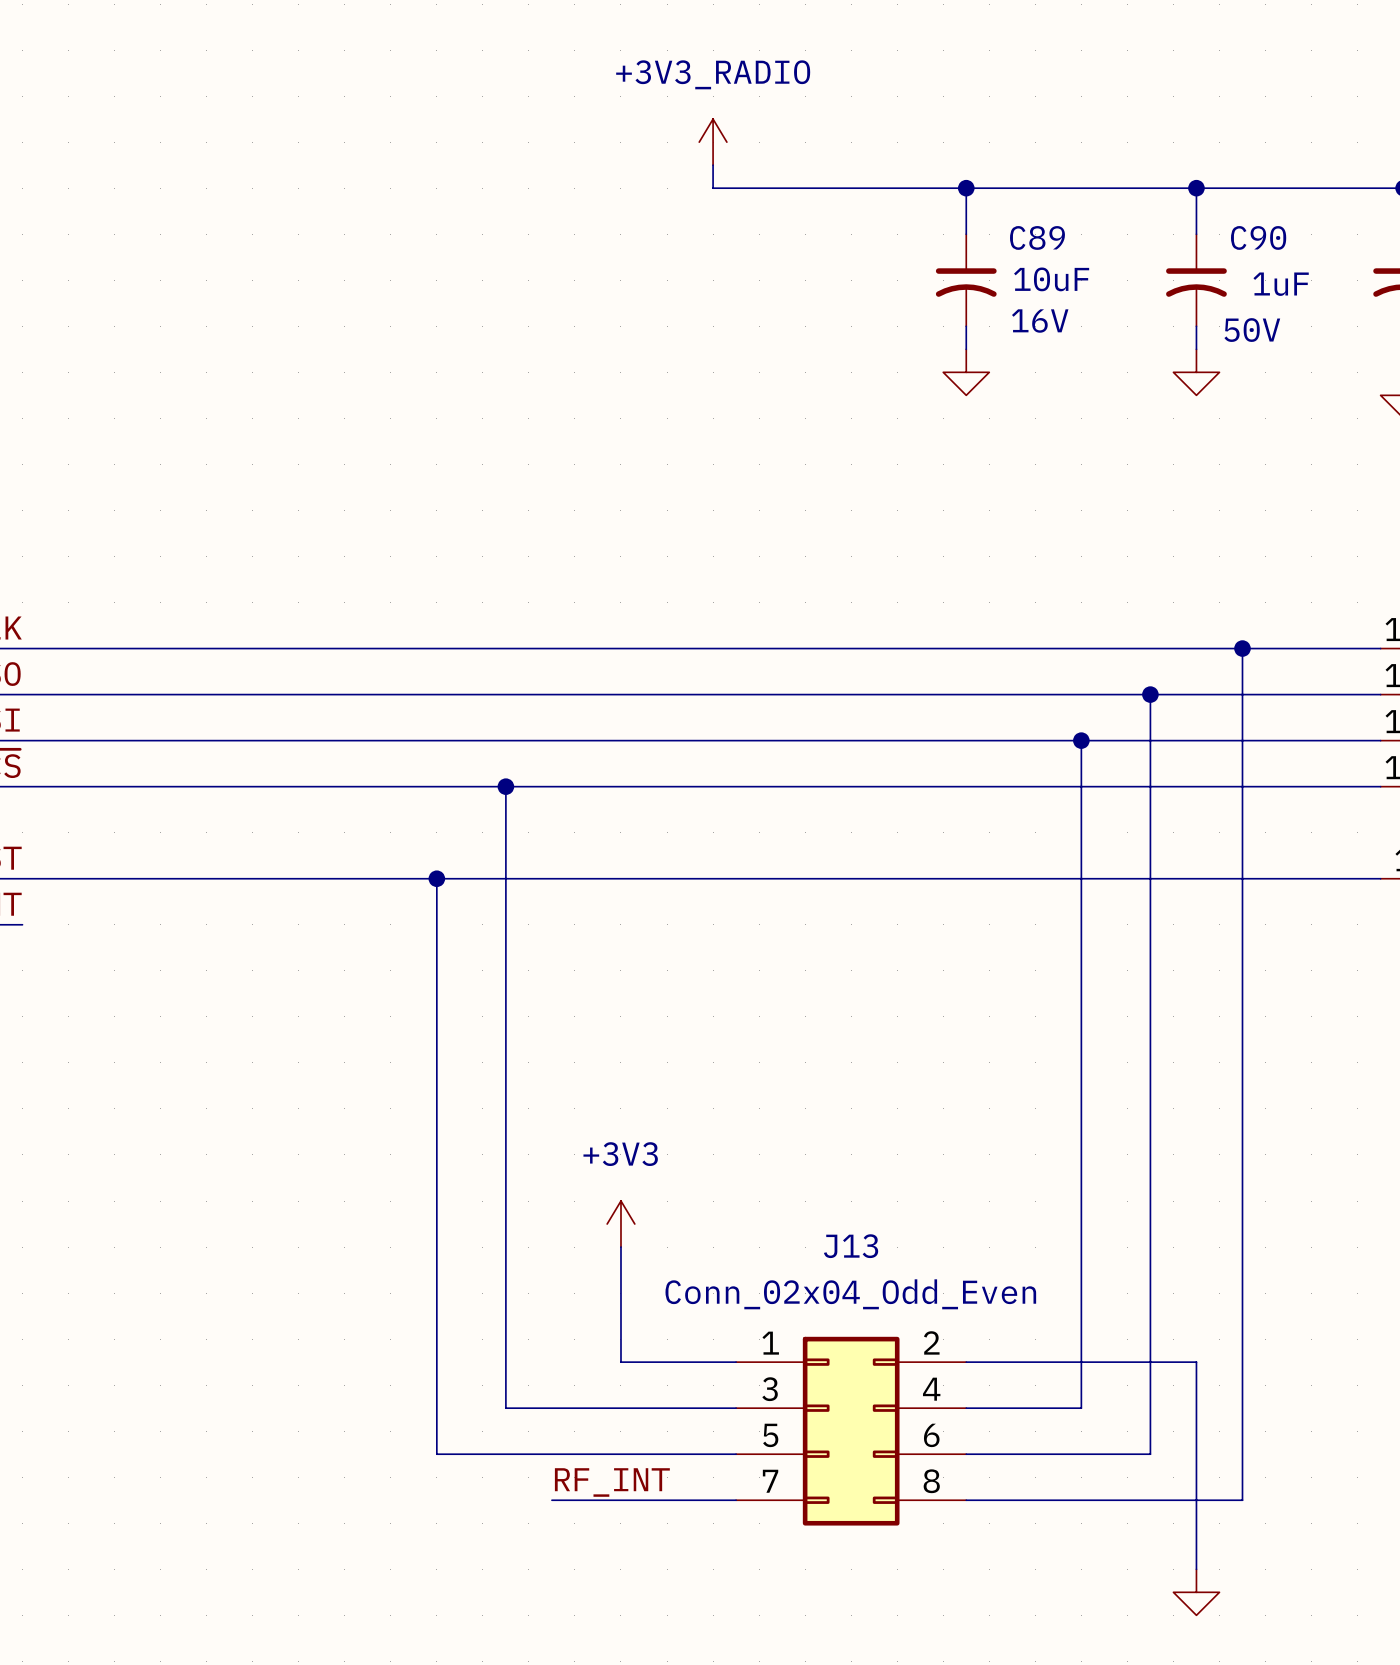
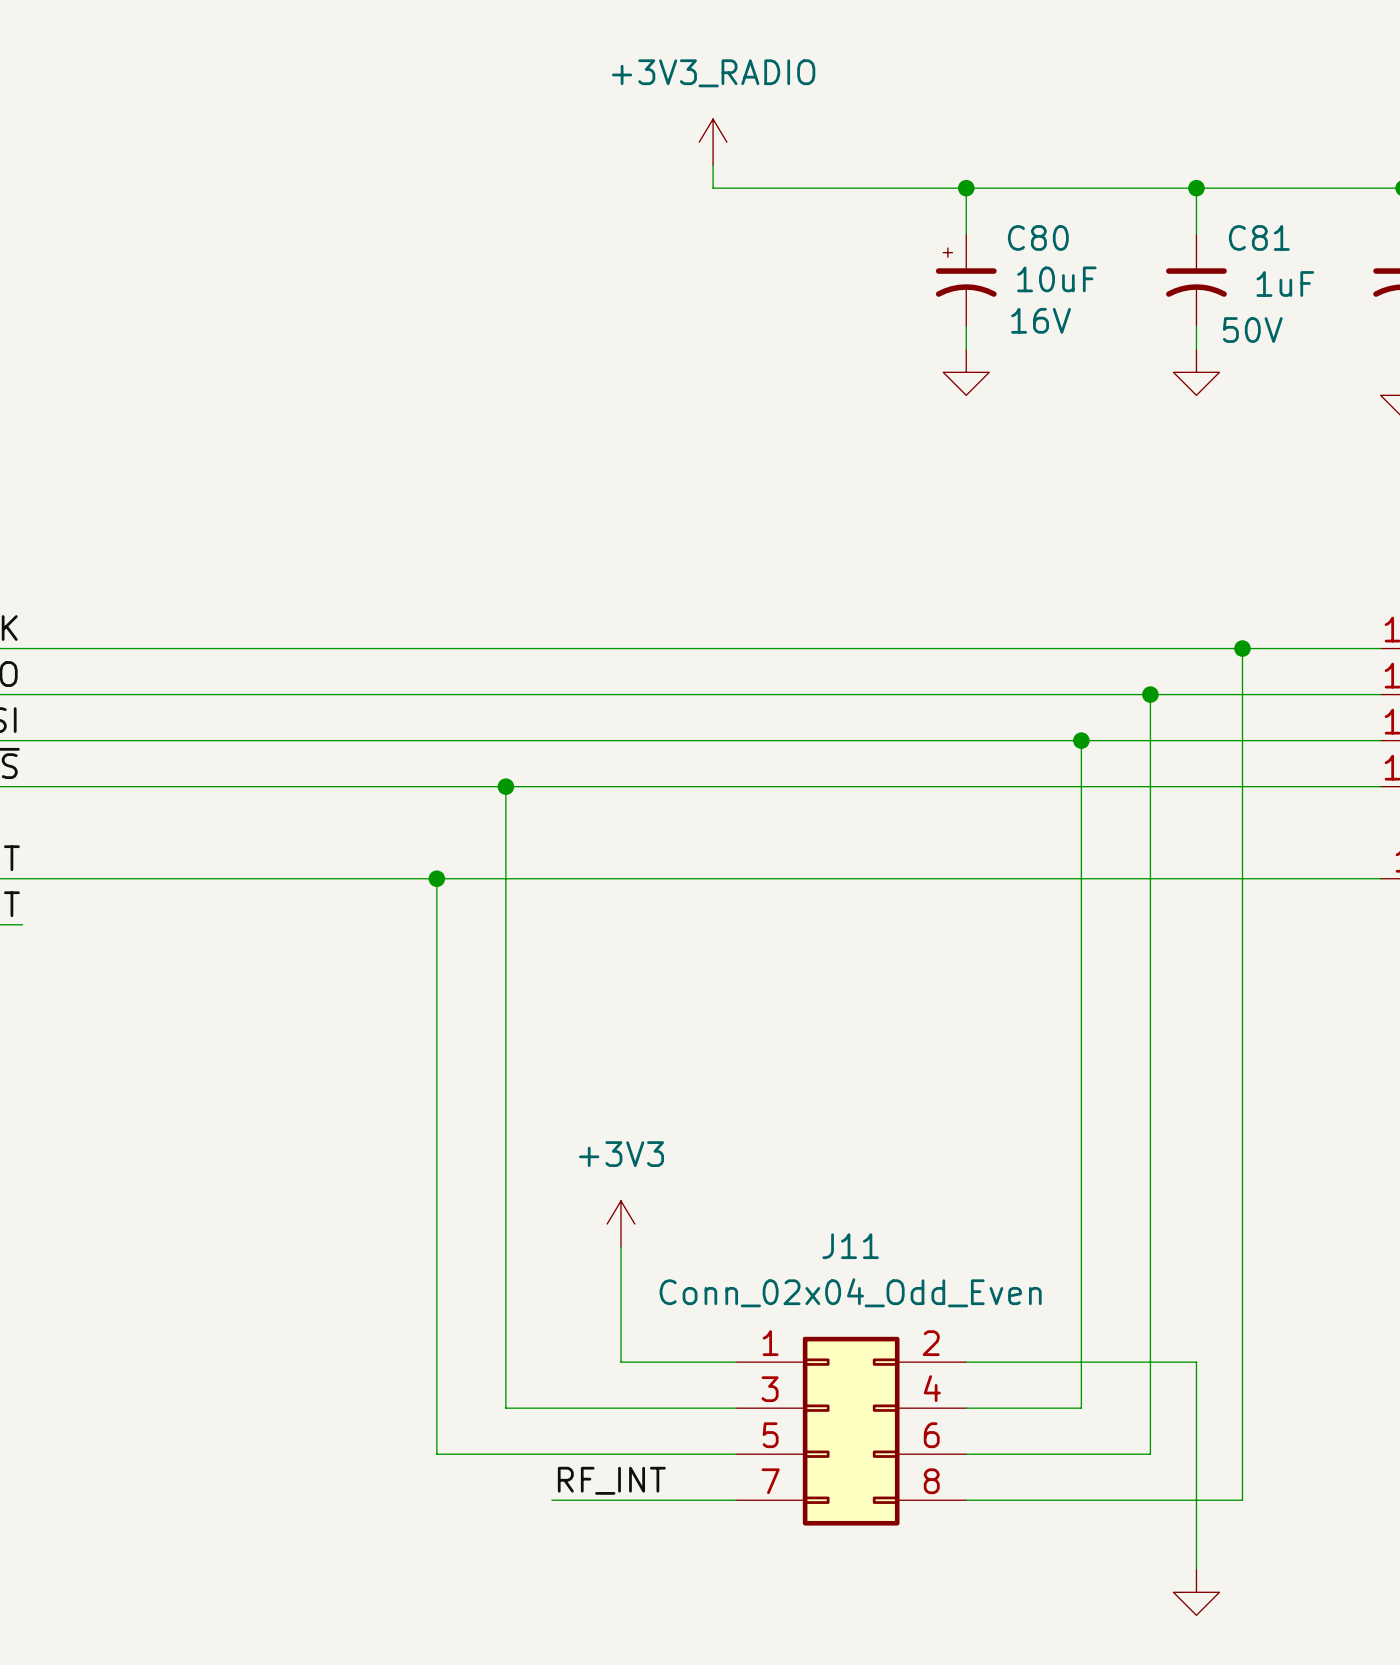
C90 name: C90 (1258, 237) -> C81 (1259, 237)
C89: 10uF (966, 280) -> none
C80: none -> 10uF (966, 280)
J13 name: J13 (851, 1246) -> J11 (850, 1246)

